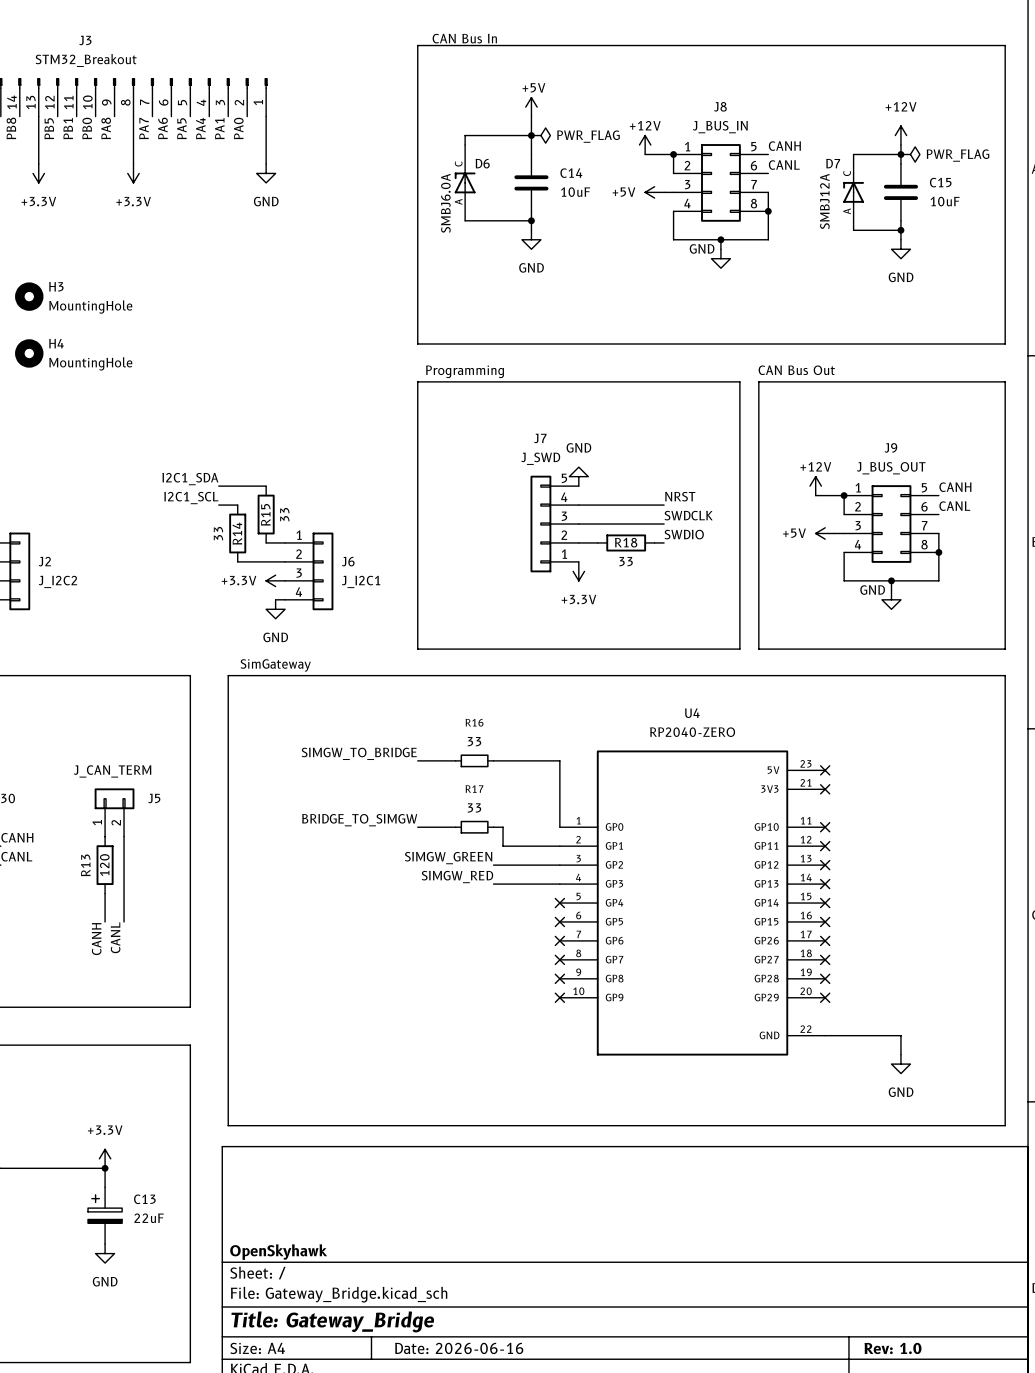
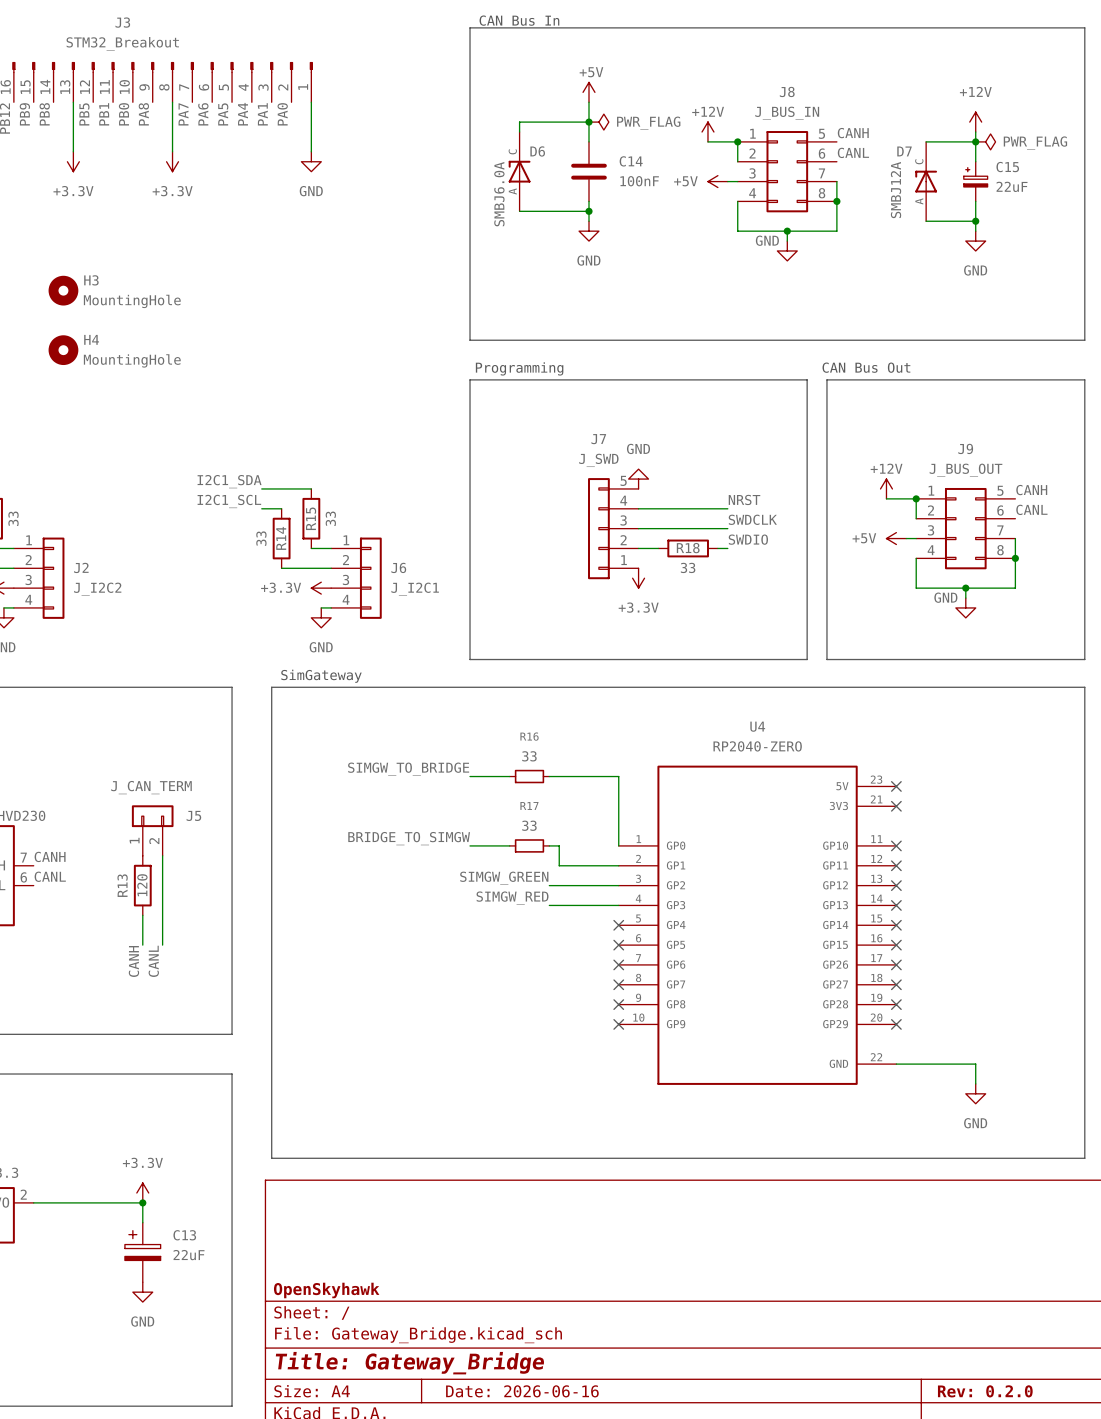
C15 symbol: [883, 163, 919, 221] -> [963, 161, 988, 202]
C14 value: 10uF (575, 192) -> 100nF (639, 181)
C15 value: 10uF (945, 201) -> 22uF (1012, 186)
title block: Rev: 1.0 (892, 1348) -> Rev: 0.2.0 (985, 1391)

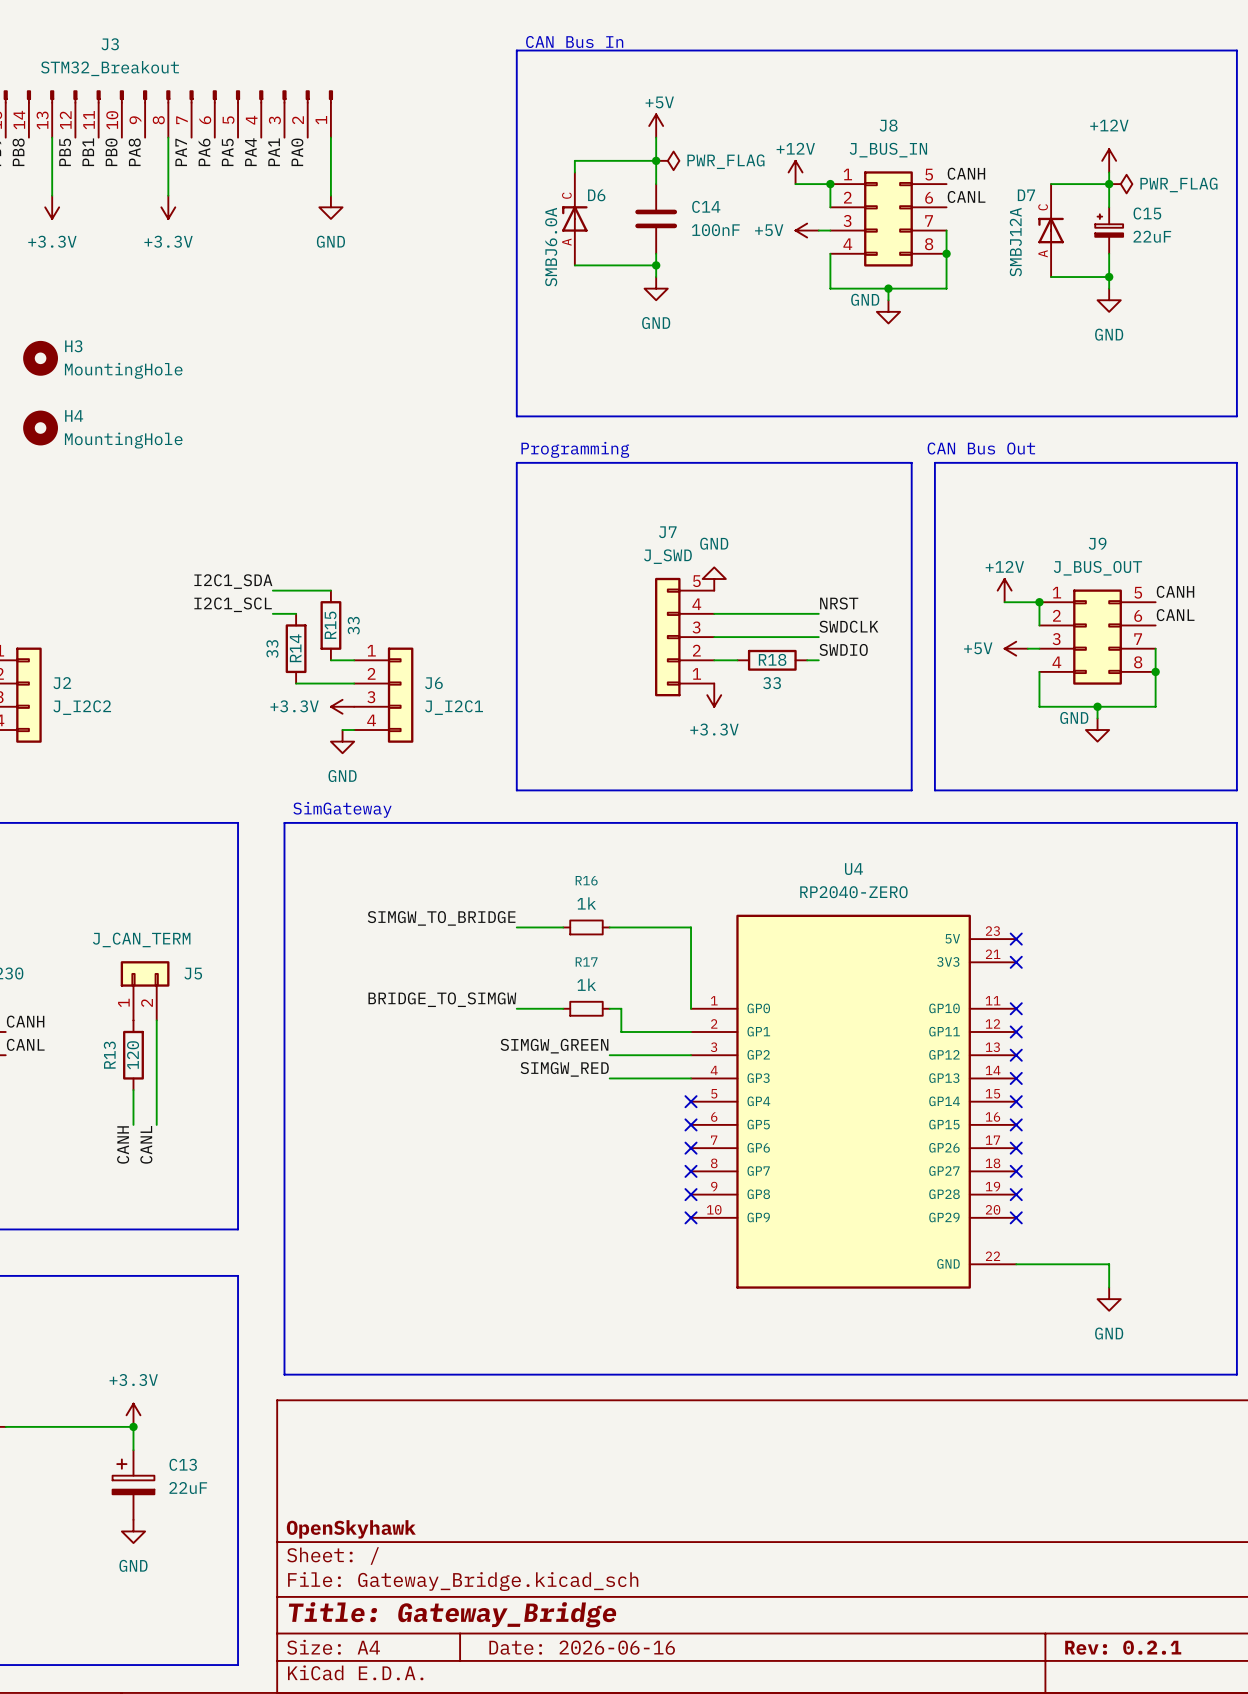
R16 value: 33 (529, 756) -> 1k (586, 903)
R17 value: 33 (529, 825) -> 1k (586, 984)
title block: Rev: 0.2.0 (985, 1391) -> Rev: 0.2.1 (1123, 1647)

